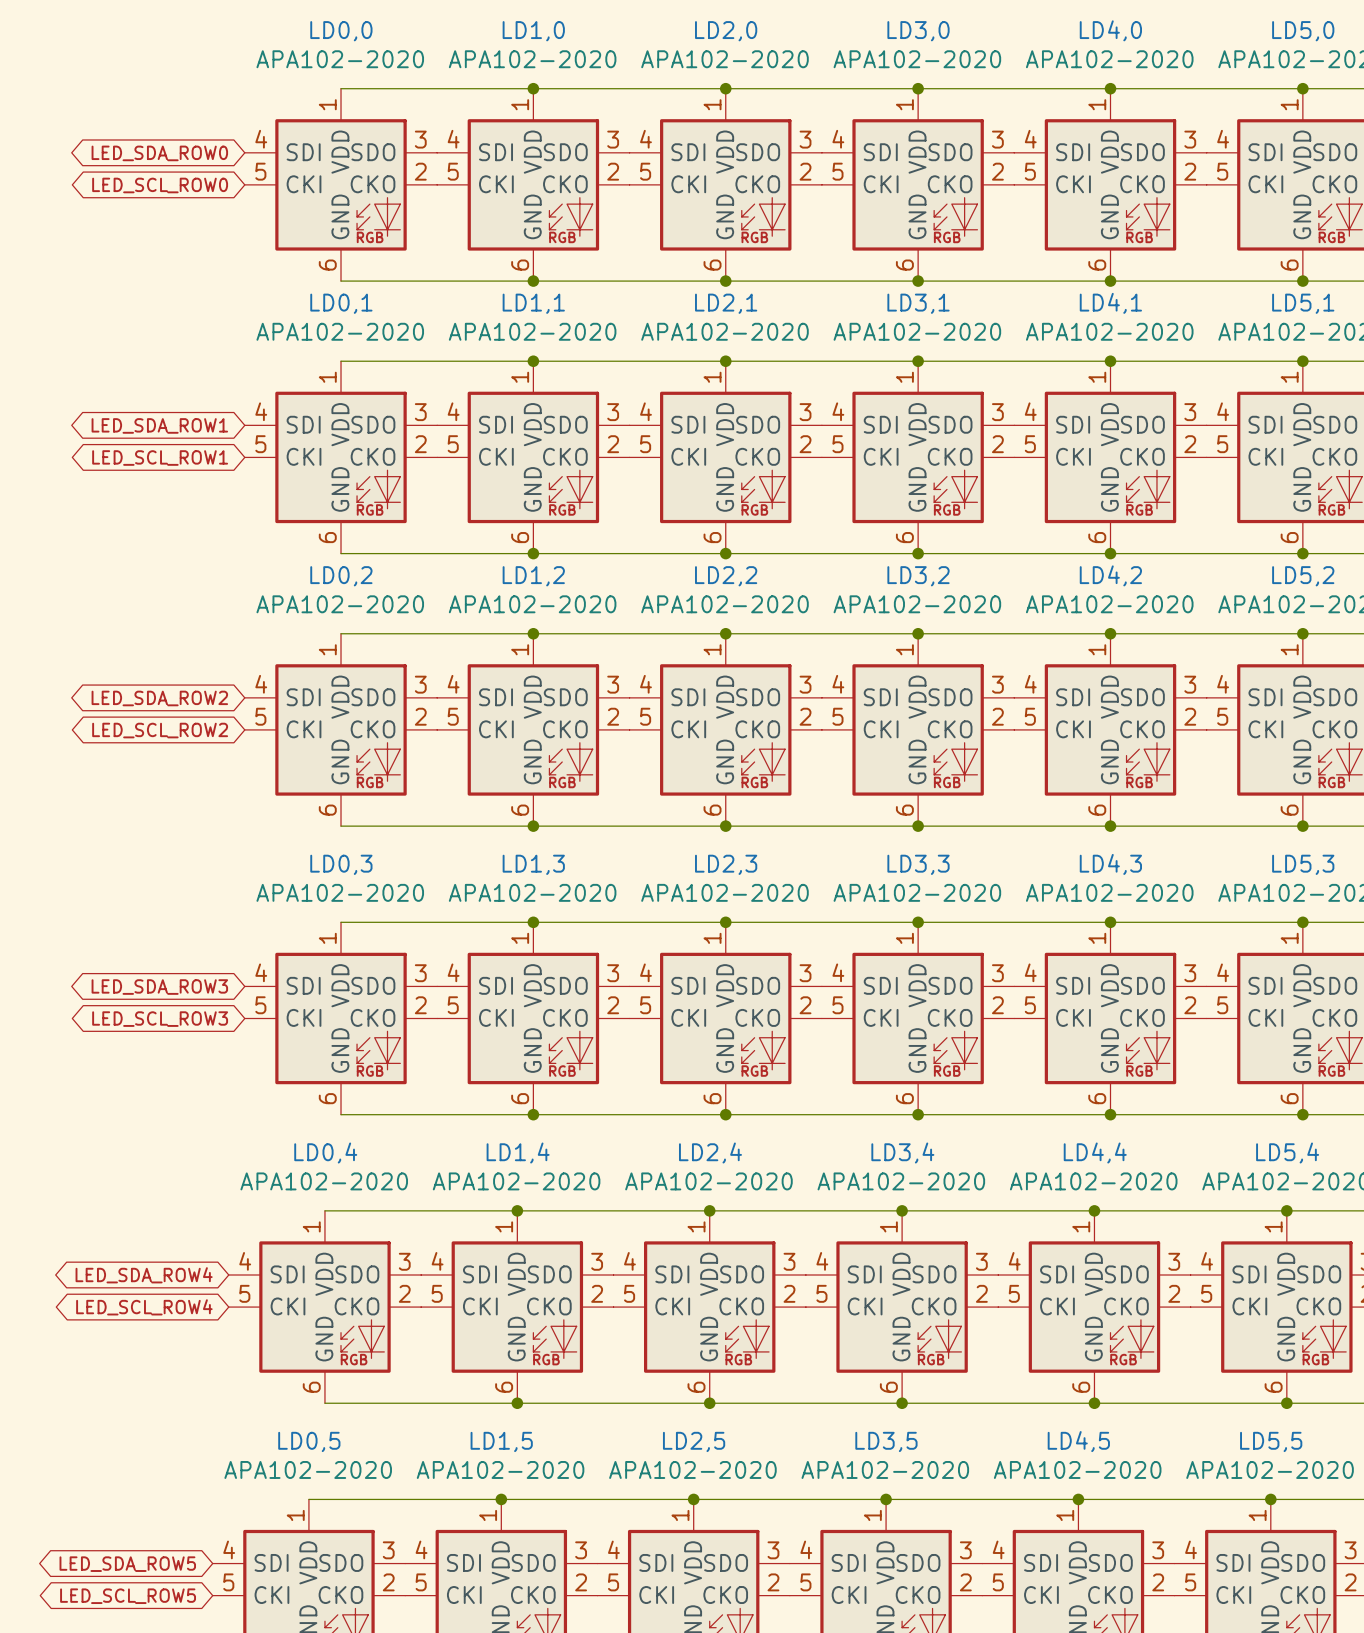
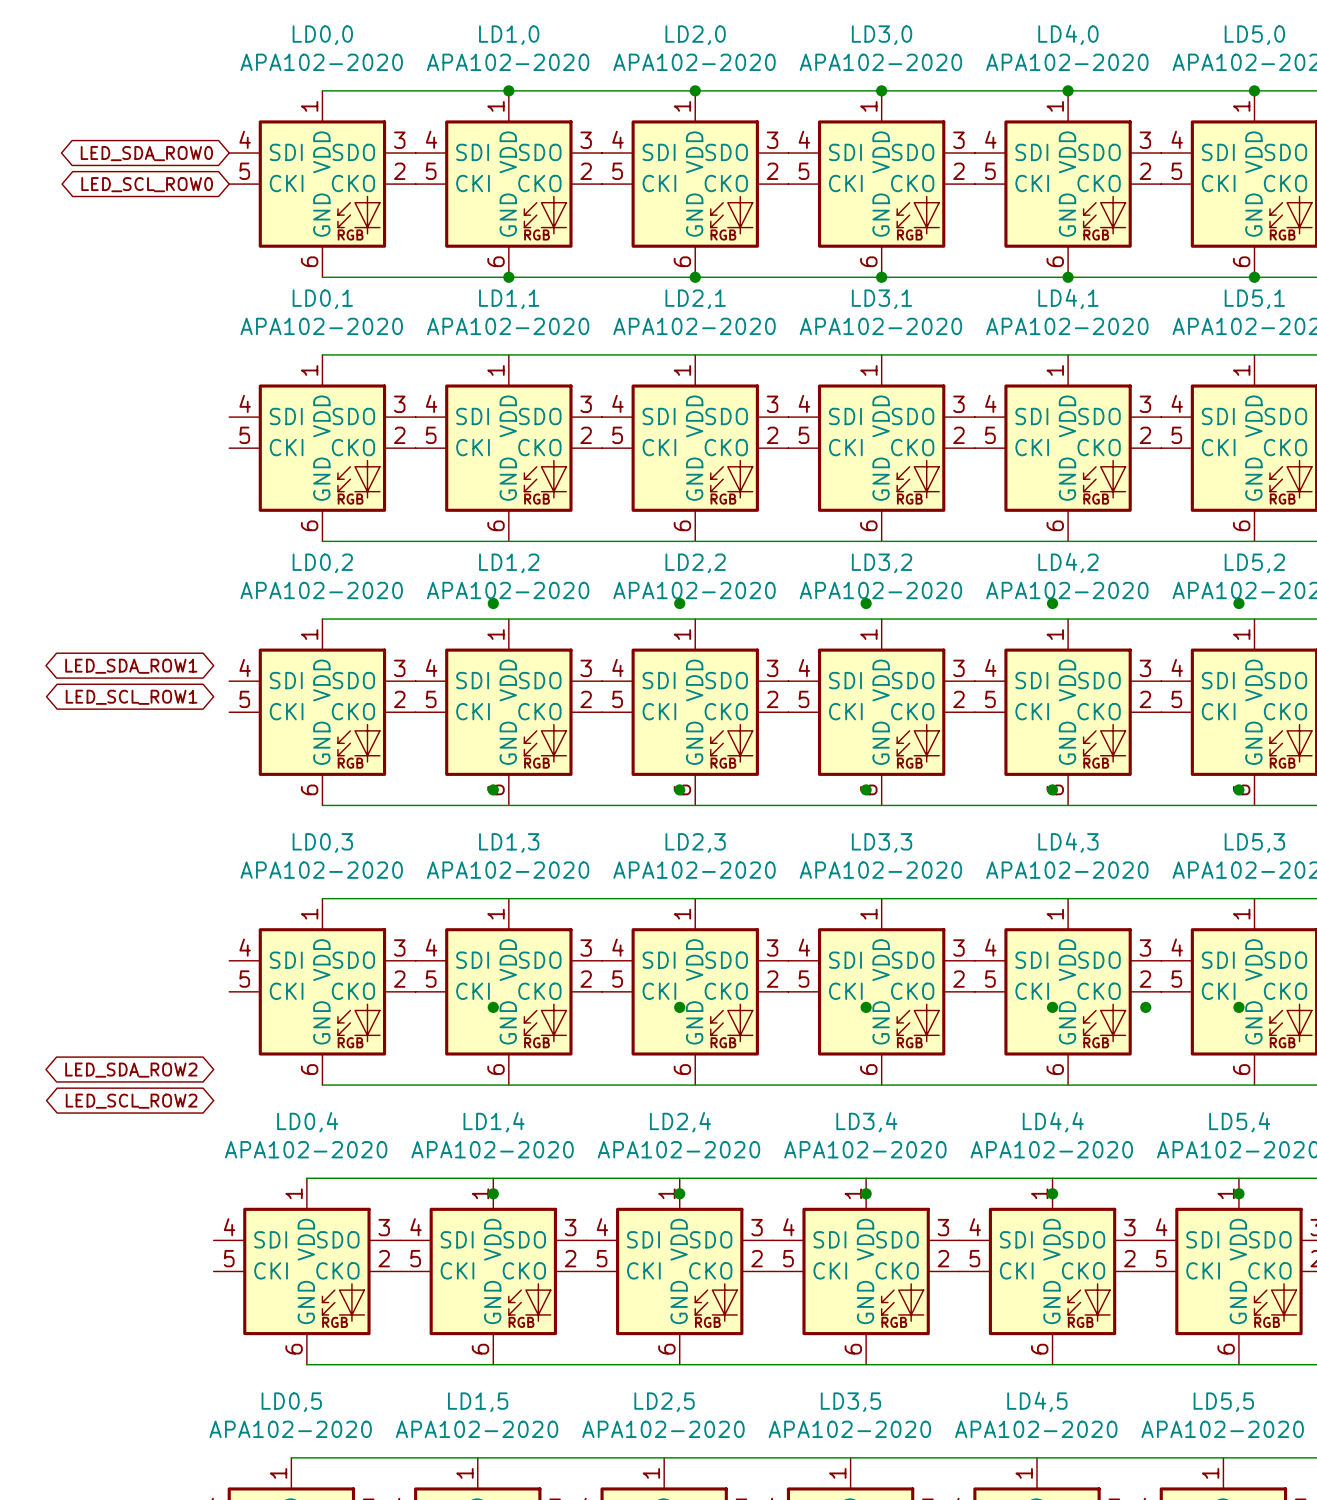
junction: (533, 361) -> none
junction: (725, 361) -> none
junction: (918, 361) -> none
junction: (1110, 361) -> none
junction: (1302, 361) -> none
global label position: LED_SDA_ROW1 (159, 425) -> LED_SDA_ROW1 (131, 666)
global label position: LED_SCL_ROW1 (160, 458) -> LED_SCL_ROW1 (131, 697)
junction: (533, 553) -> none
junction: (725, 553) -> none
junction: (918, 553) -> none
junction: (1110, 553) -> none
junction: (1302, 553) -> none
junction position: (533, 633) -> (493, 603)
junction position: (725, 633) -> (679, 603)
junction position: (918, 633) -> (866, 603)
junction position: (1110, 633) -> (1052, 603)
junction position: (1302, 633) -> (1238, 603)
global label: LED_SDA_ROW2 (159, 698) -> none
global label: LED_SCL_ROW2 (160, 730) -> none
junction position: (533, 826) -> (493, 789)
junction position: (725, 826) -> (679, 789)
junction position: (918, 826) -> (866, 789)
junction position: (1110, 826) -> (1052, 789)
junction position: (1302, 826) -> (1238, 789)
junction: (533, 922) -> none
junction: (725, 922) -> none
junction: (918, 922) -> none
junction: (1110, 922) -> none
junction: (1302, 922) -> none
global label: LED_SDA_ROW3 (159, 987) -> none
global label: LED_SCL_ROW3 (160, 1019) -> none
junction: none -> (493, 1007)
junction: none -> (679, 1007)
junction: none -> (866, 1007)
junction: none -> (1052, 1007)
junction: none -> (1145, 1007)
junction: none -> (1238, 1007)
global label: none -> LED_SDA_ROW2 (131, 1070)
junction: (533, 1114) -> none
junction: (725, 1114) -> none
junction: (918, 1114) -> none
junction: (1110, 1114) -> none
junction: (1302, 1114) -> none
global label: none -> LED_SCL_ROW2 (131, 1101)
junction position: (517, 1210) -> (493, 1193)
junction position: (709, 1210) -> (679, 1193)
junction position: (902, 1210) -> (866, 1193)
junction position: (1094, 1210) -> (1052, 1193)
junction position: (1286, 1210) -> (1238, 1193)
global label: LED_SDA_ROW4 (144, 1275) -> none
global label: LED_SCL_ROW4 (144, 1307) -> none
junction: (517, 1403) -> none
junction: (709, 1403) -> none
junction: (902, 1403) -> none
junction: (1094, 1403) -> none
junction: (1286, 1403) -> none
junction: (501, 1499) -> none
junction: (693, 1499) -> none
junction: (886, 1499) -> none
junction: (1078, 1499) -> none
junction: (1270, 1499) -> none

